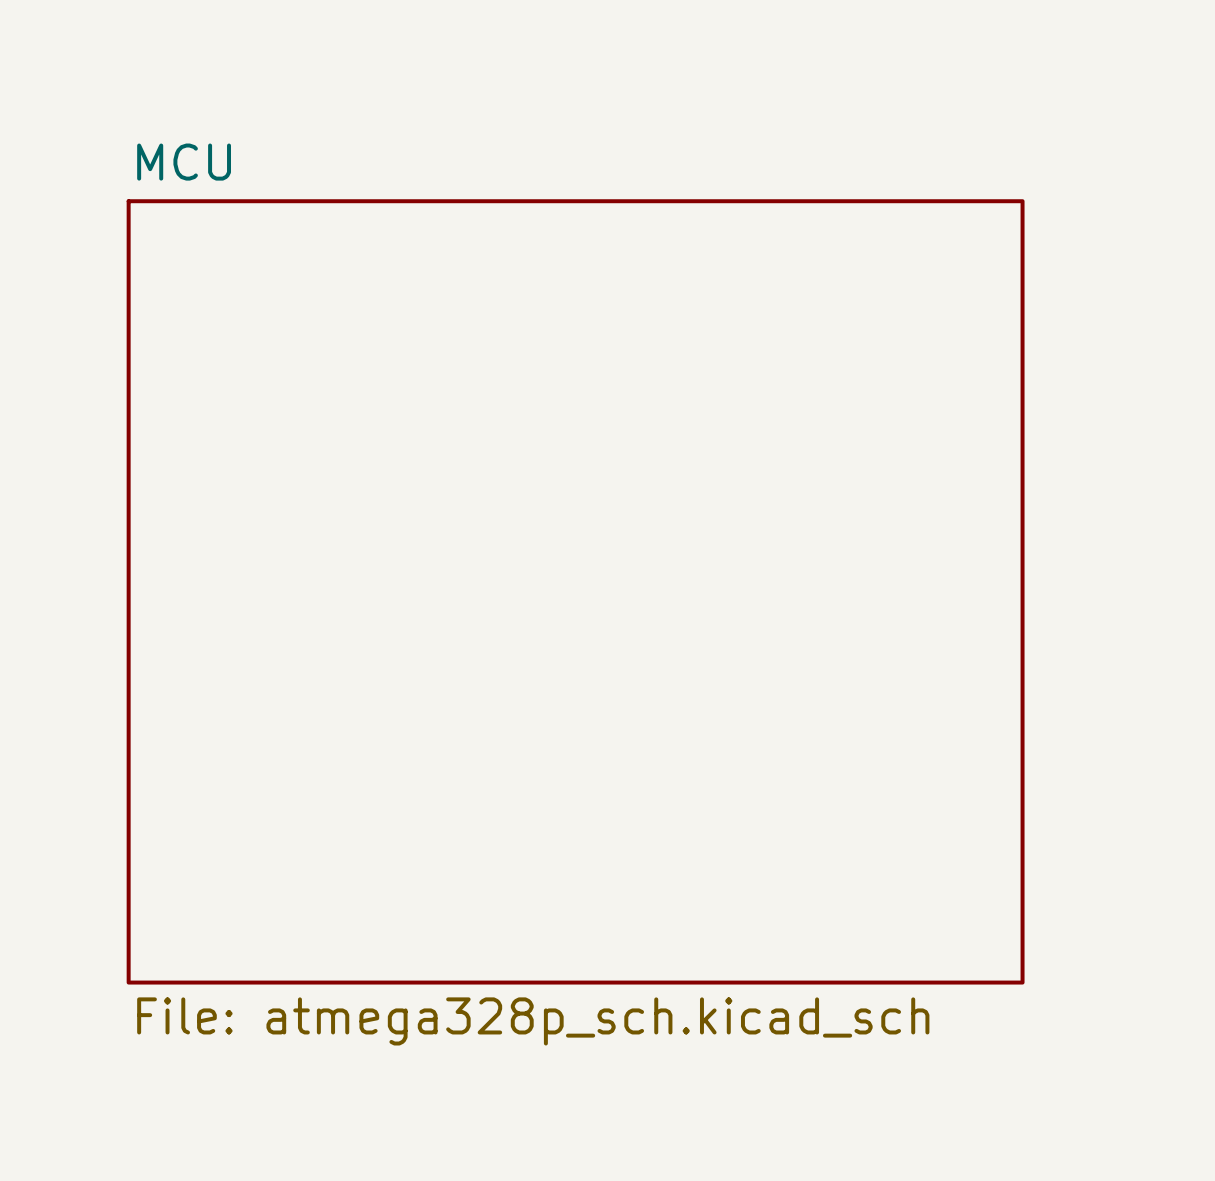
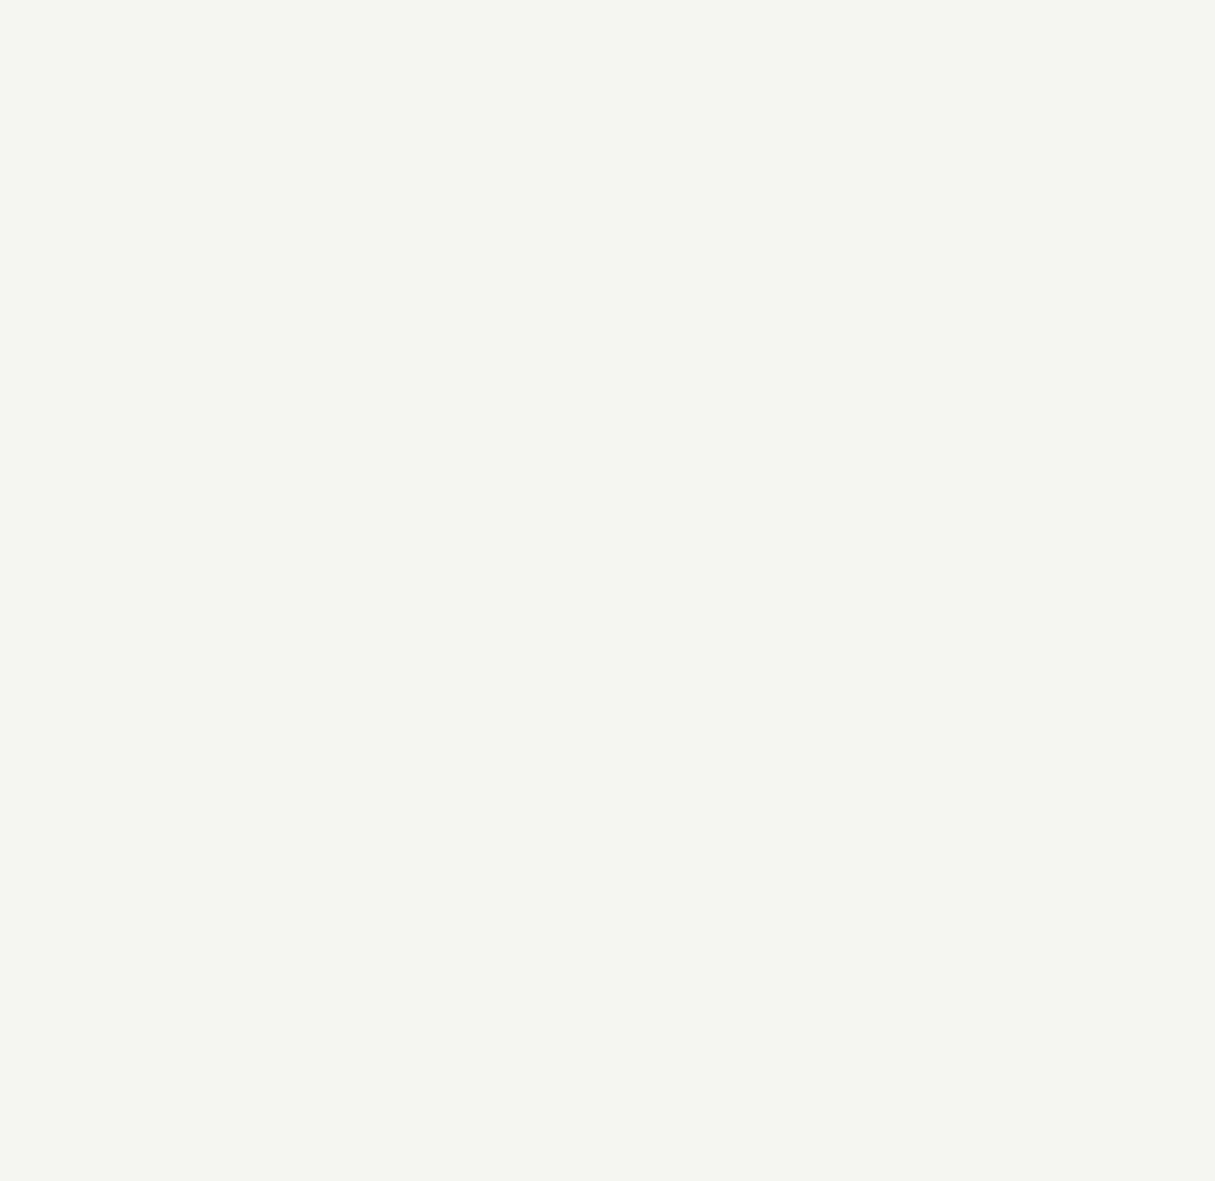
sheet MCU: File: atmega328p_sch.kicad_sch (575, 591) -> none

